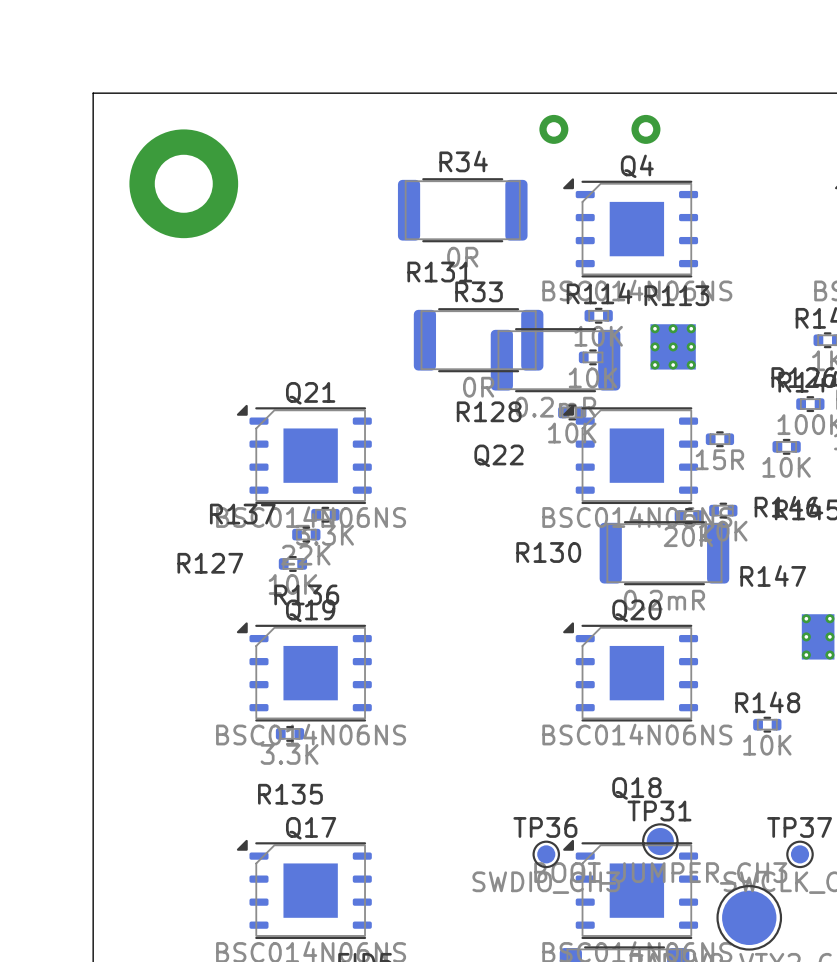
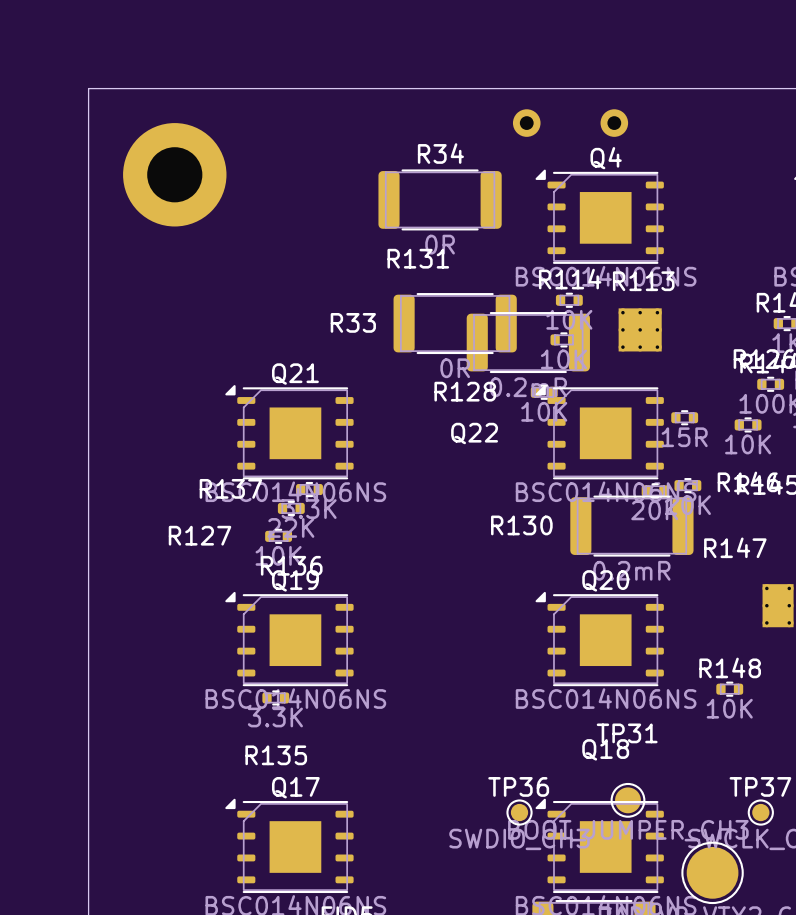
R33 name position: R33 (479, 291) -> R33 (353, 322)
TP31 name position: TP31 (659, 811) -> TP31 (627, 733)

